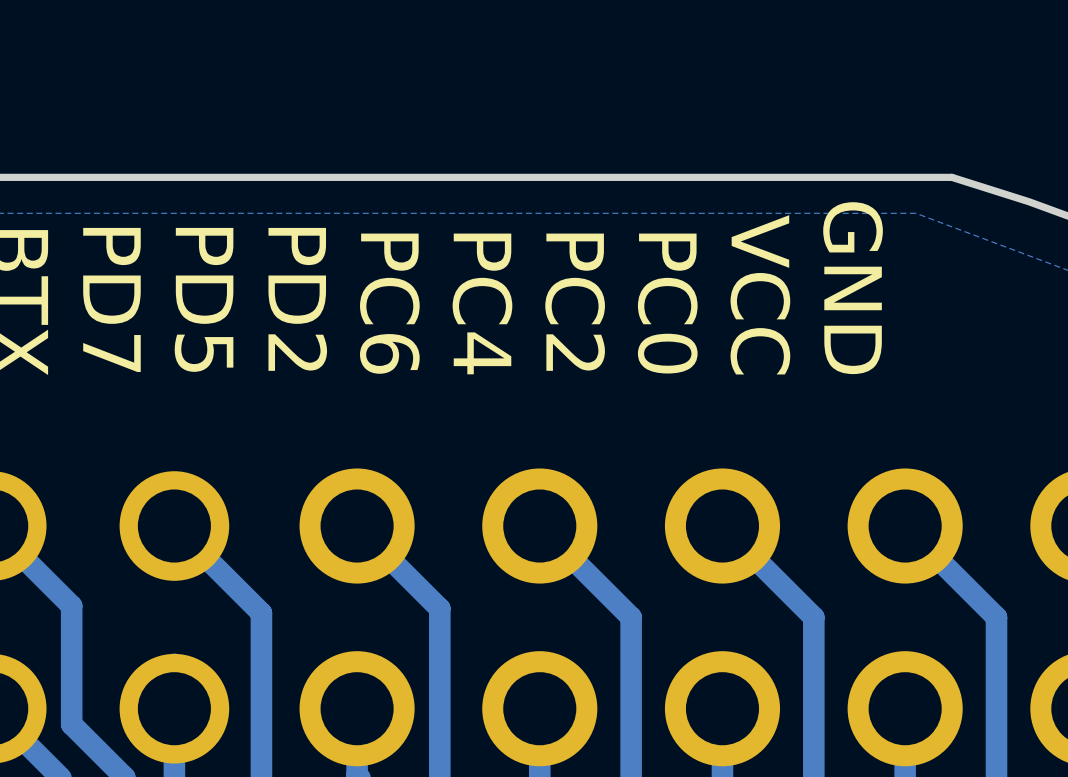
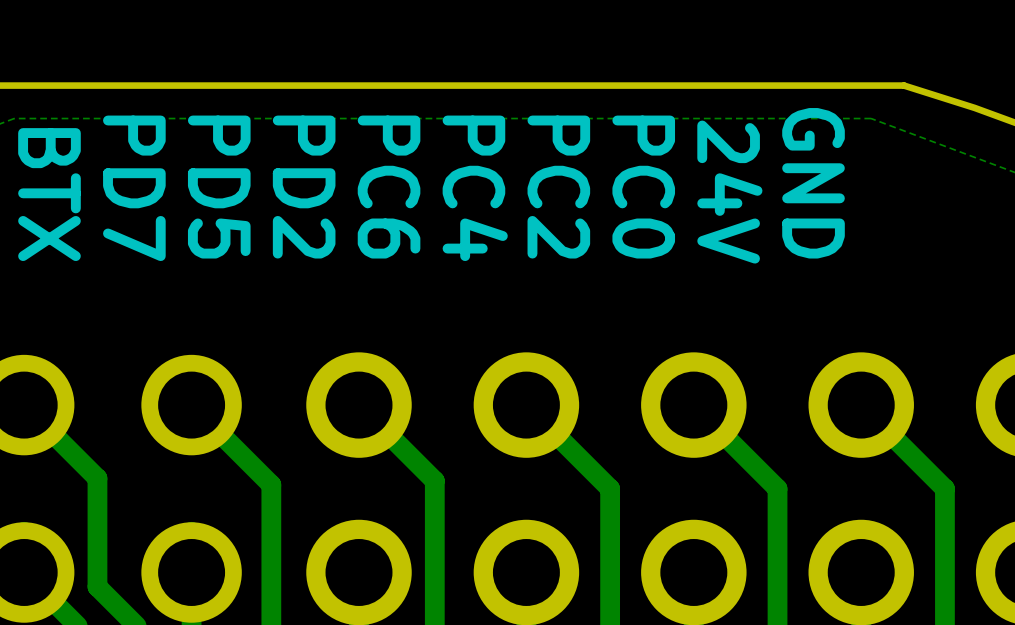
text: VCC (760, 294) -> 24V (729, 192)

